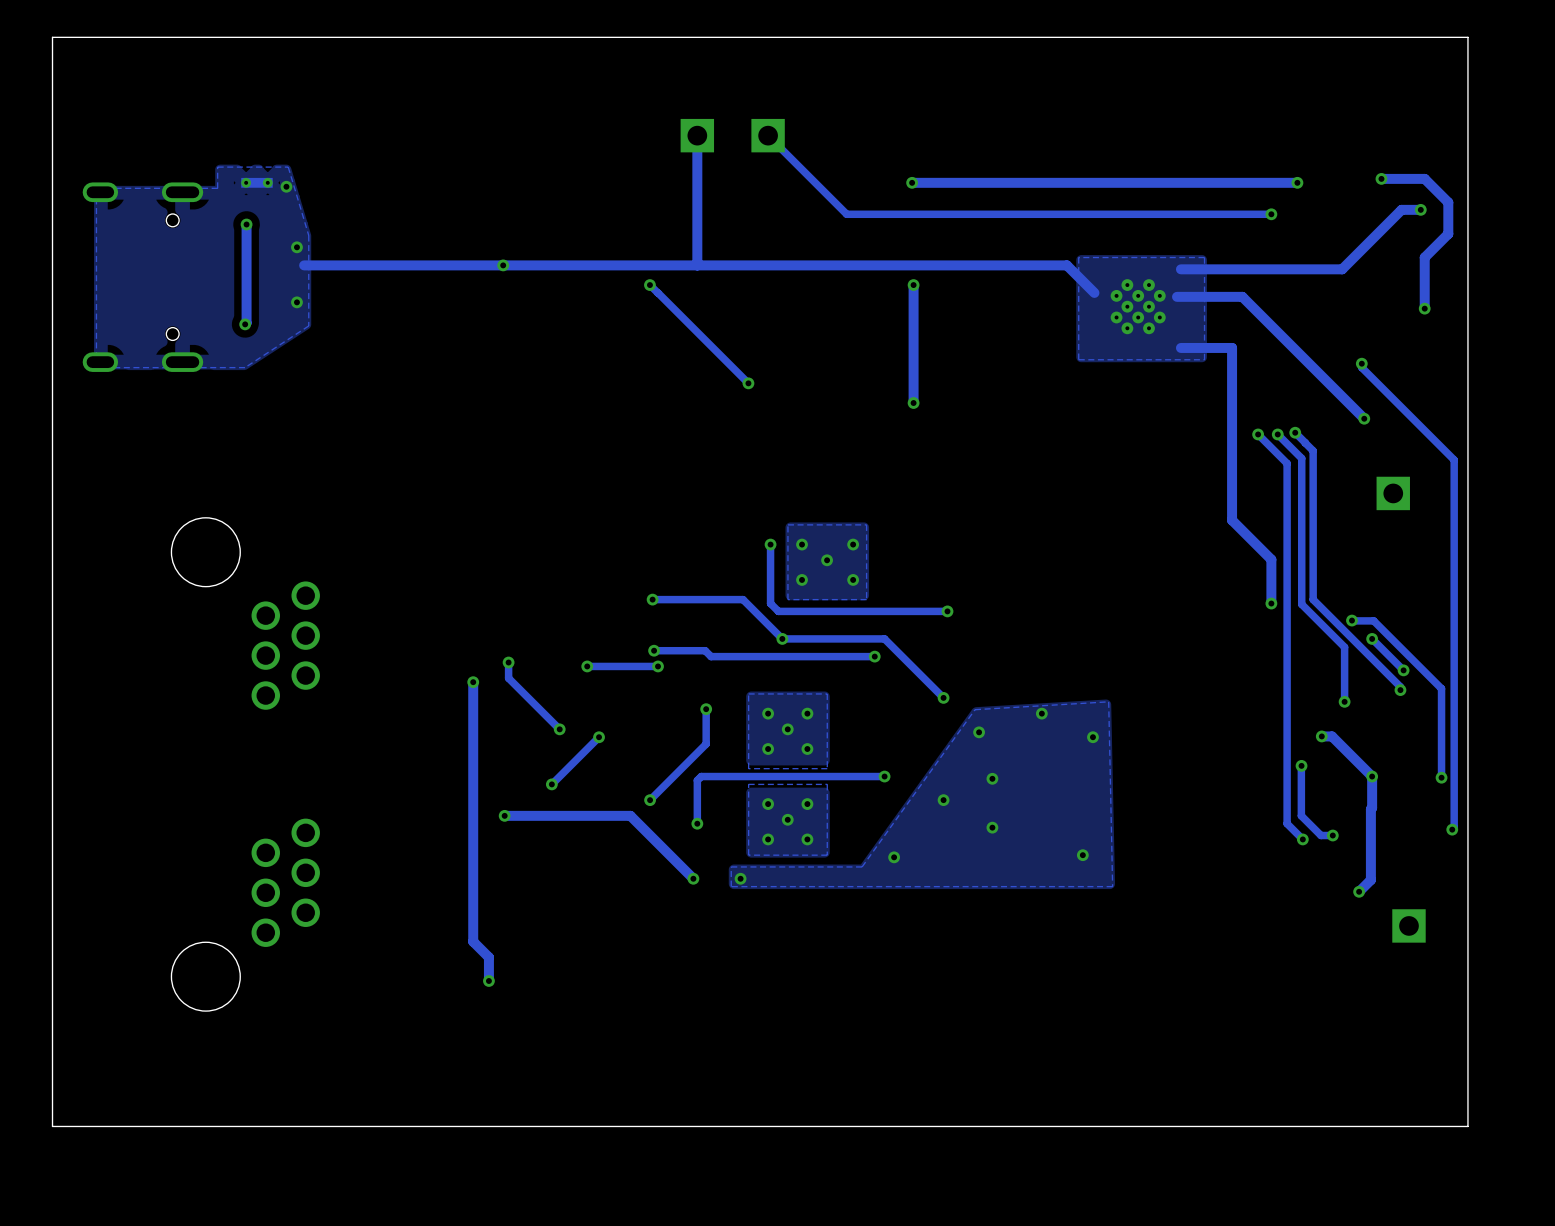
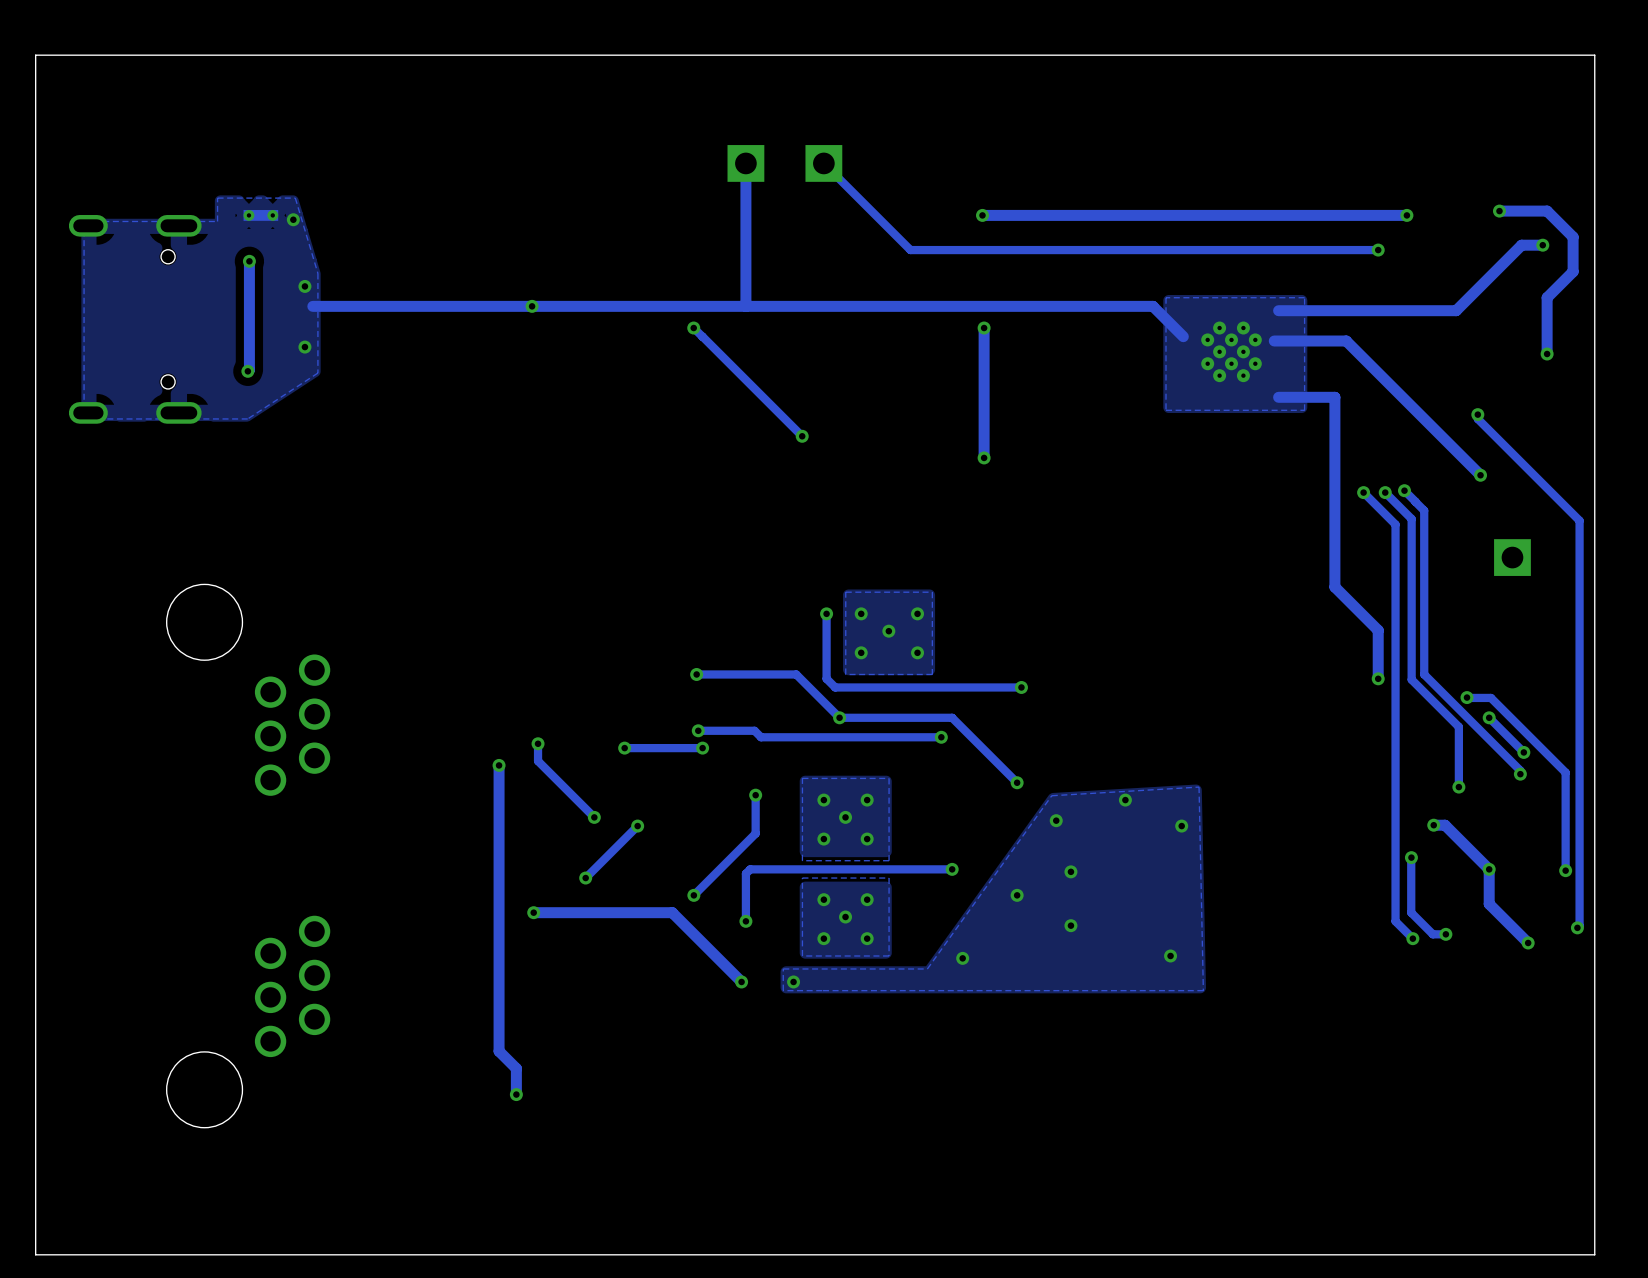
track: (1372, 807) (1370, 879) (1359, 891) -> (1489, 904) (1528, 942)
via position: (1359, 891) -> (1528, 942)
part: (1408, 925) -> none

